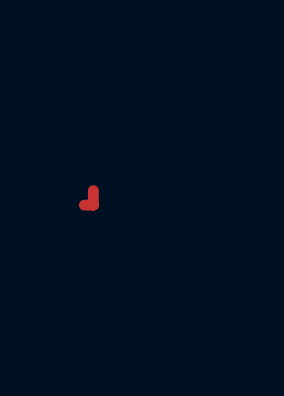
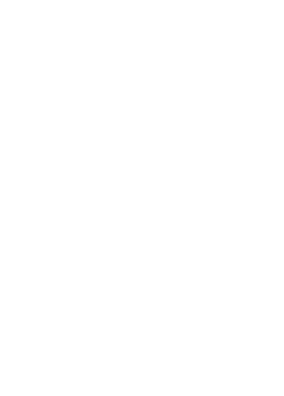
track: (93, 190) (93, 205) (84, 205) -> none

